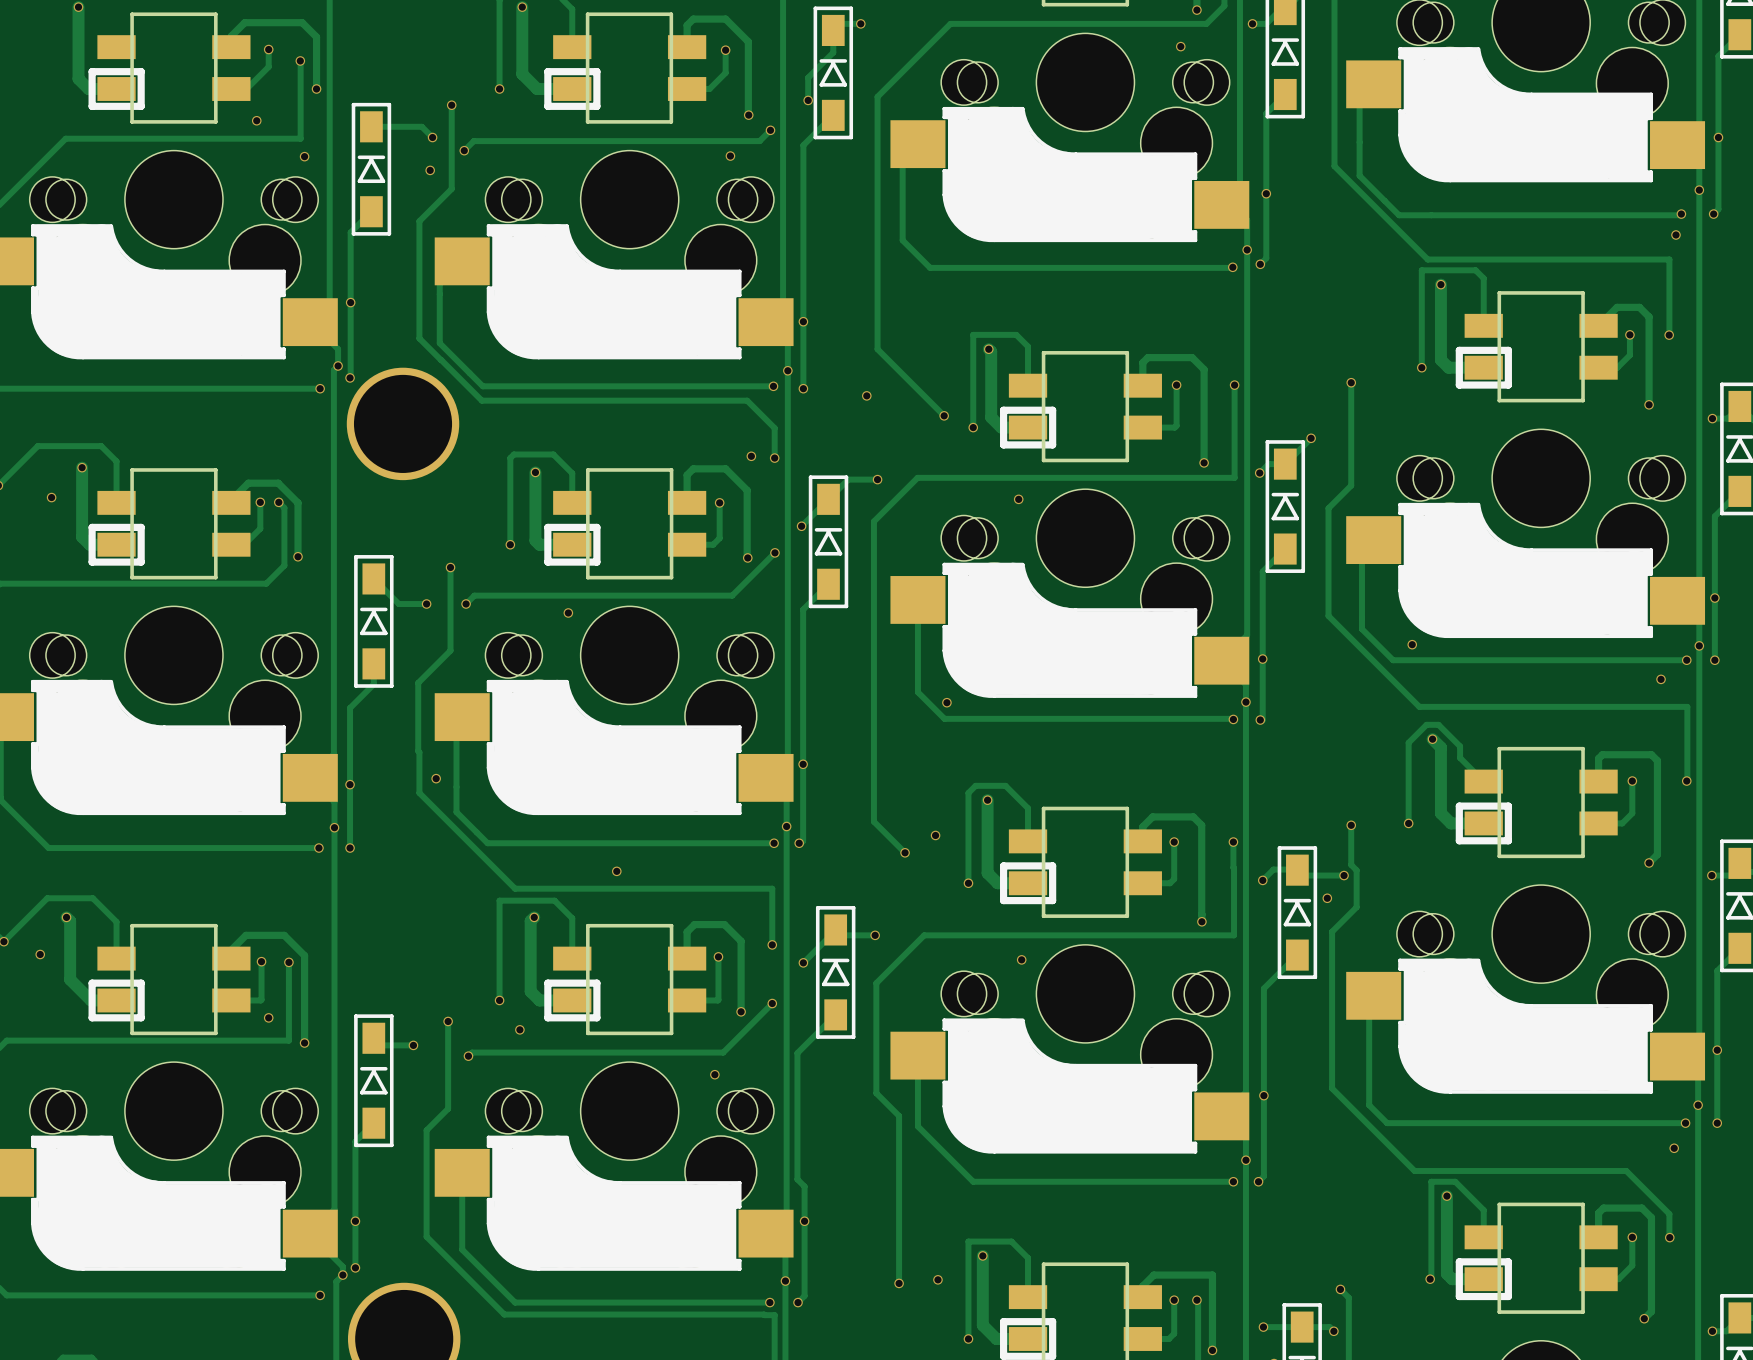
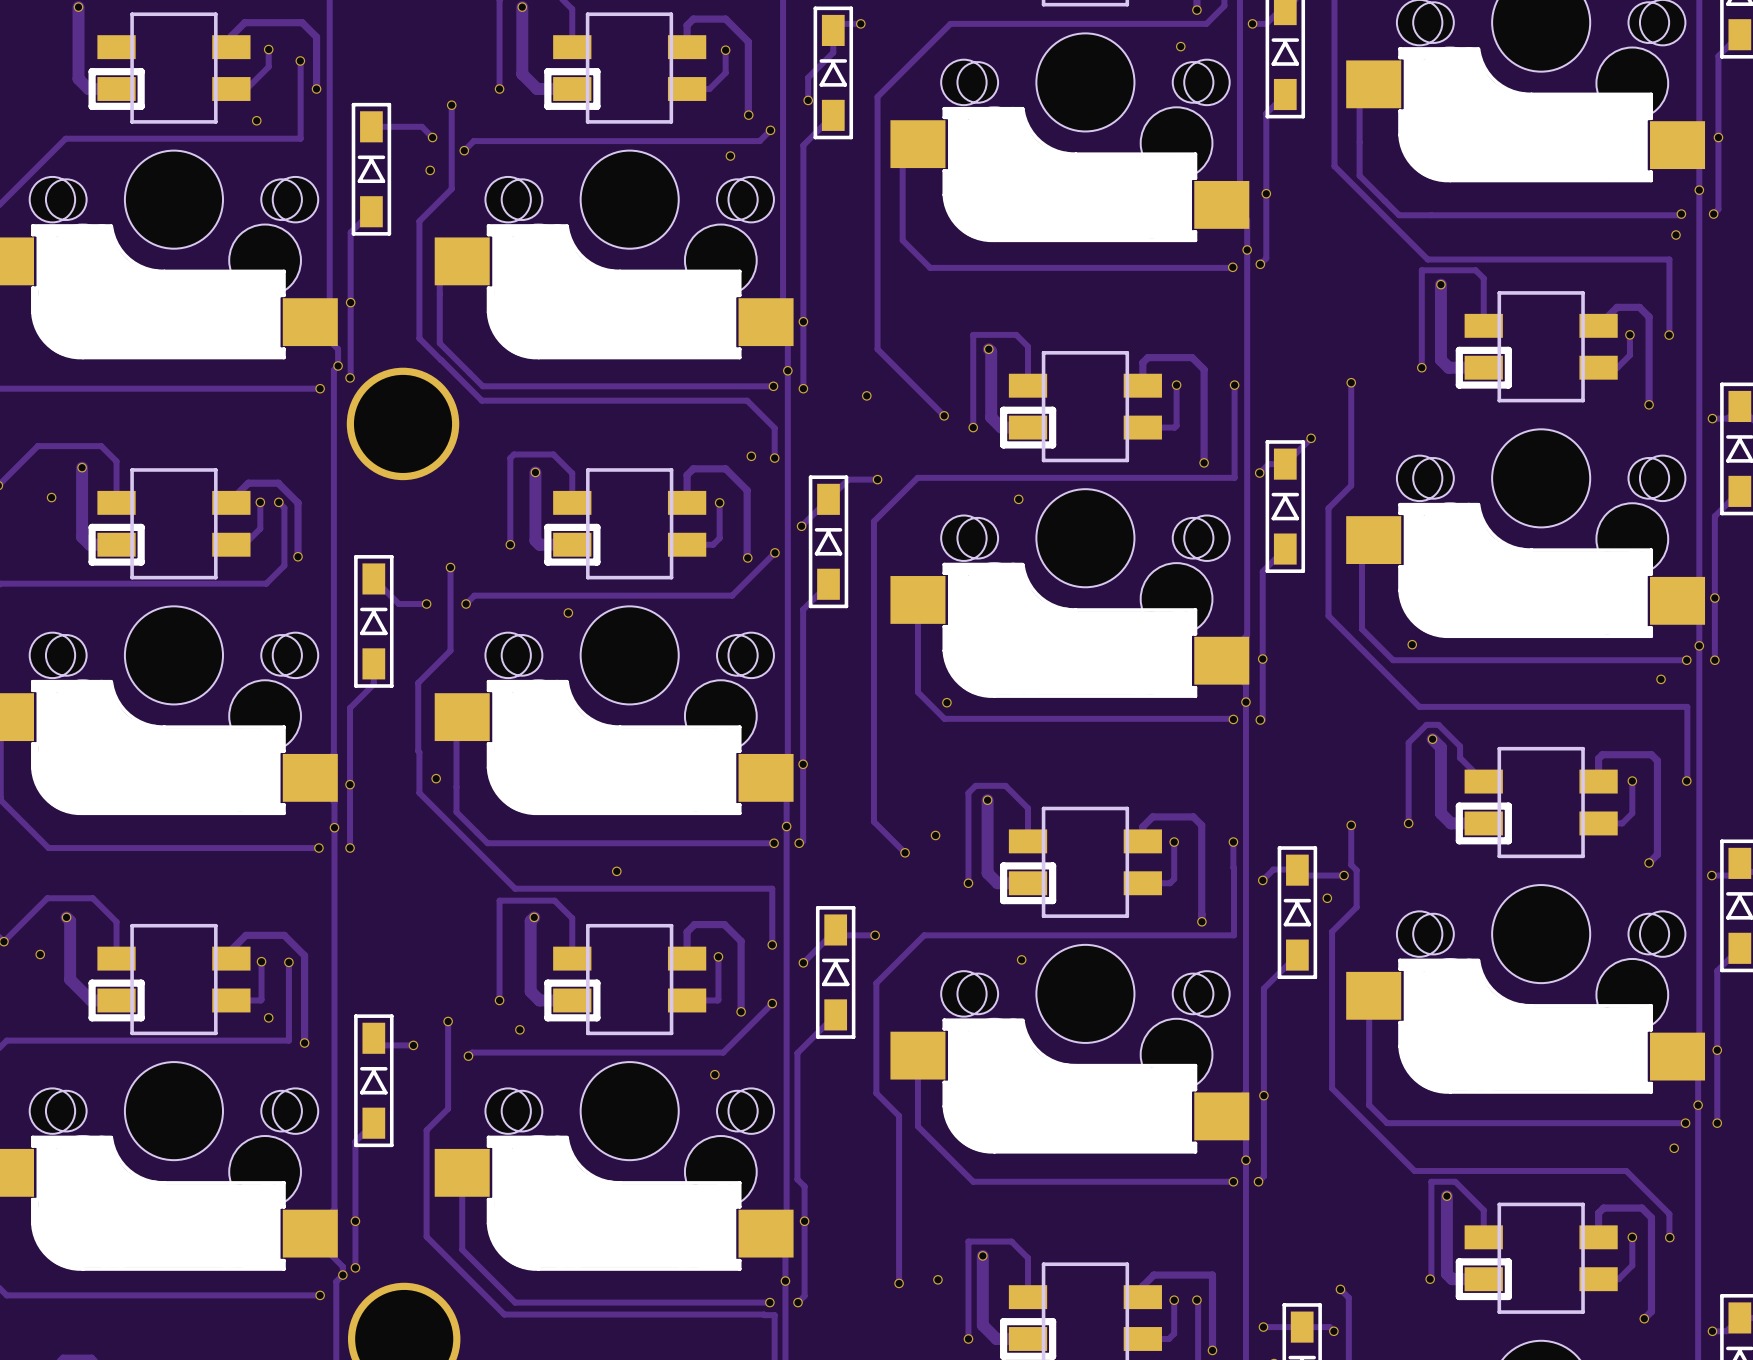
via: (304, 156) -> none

